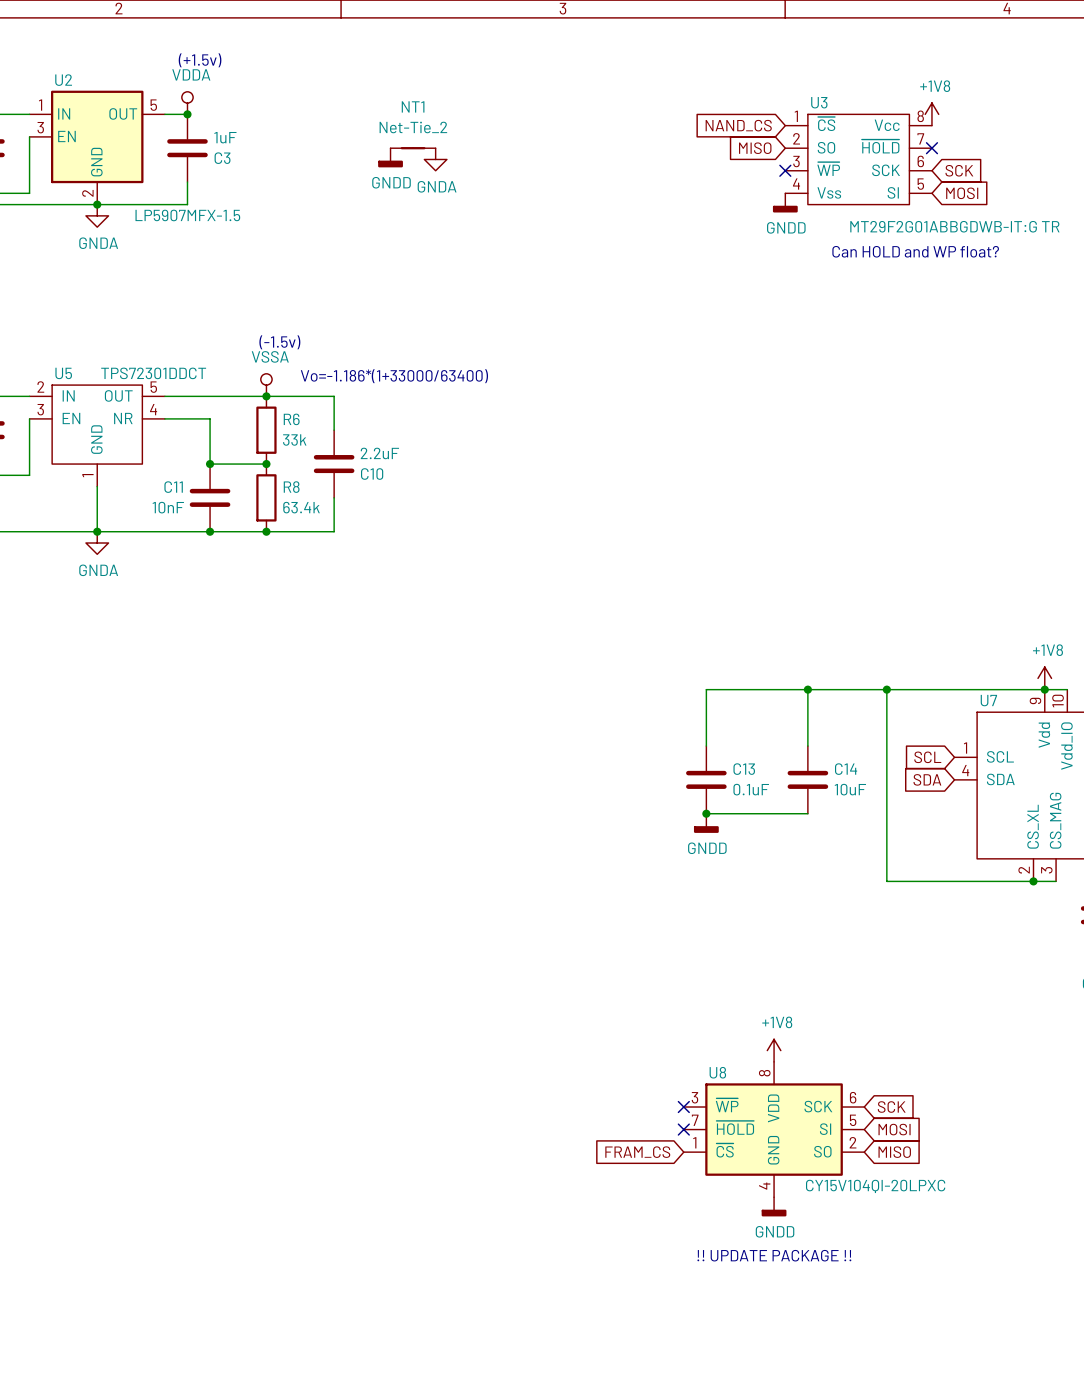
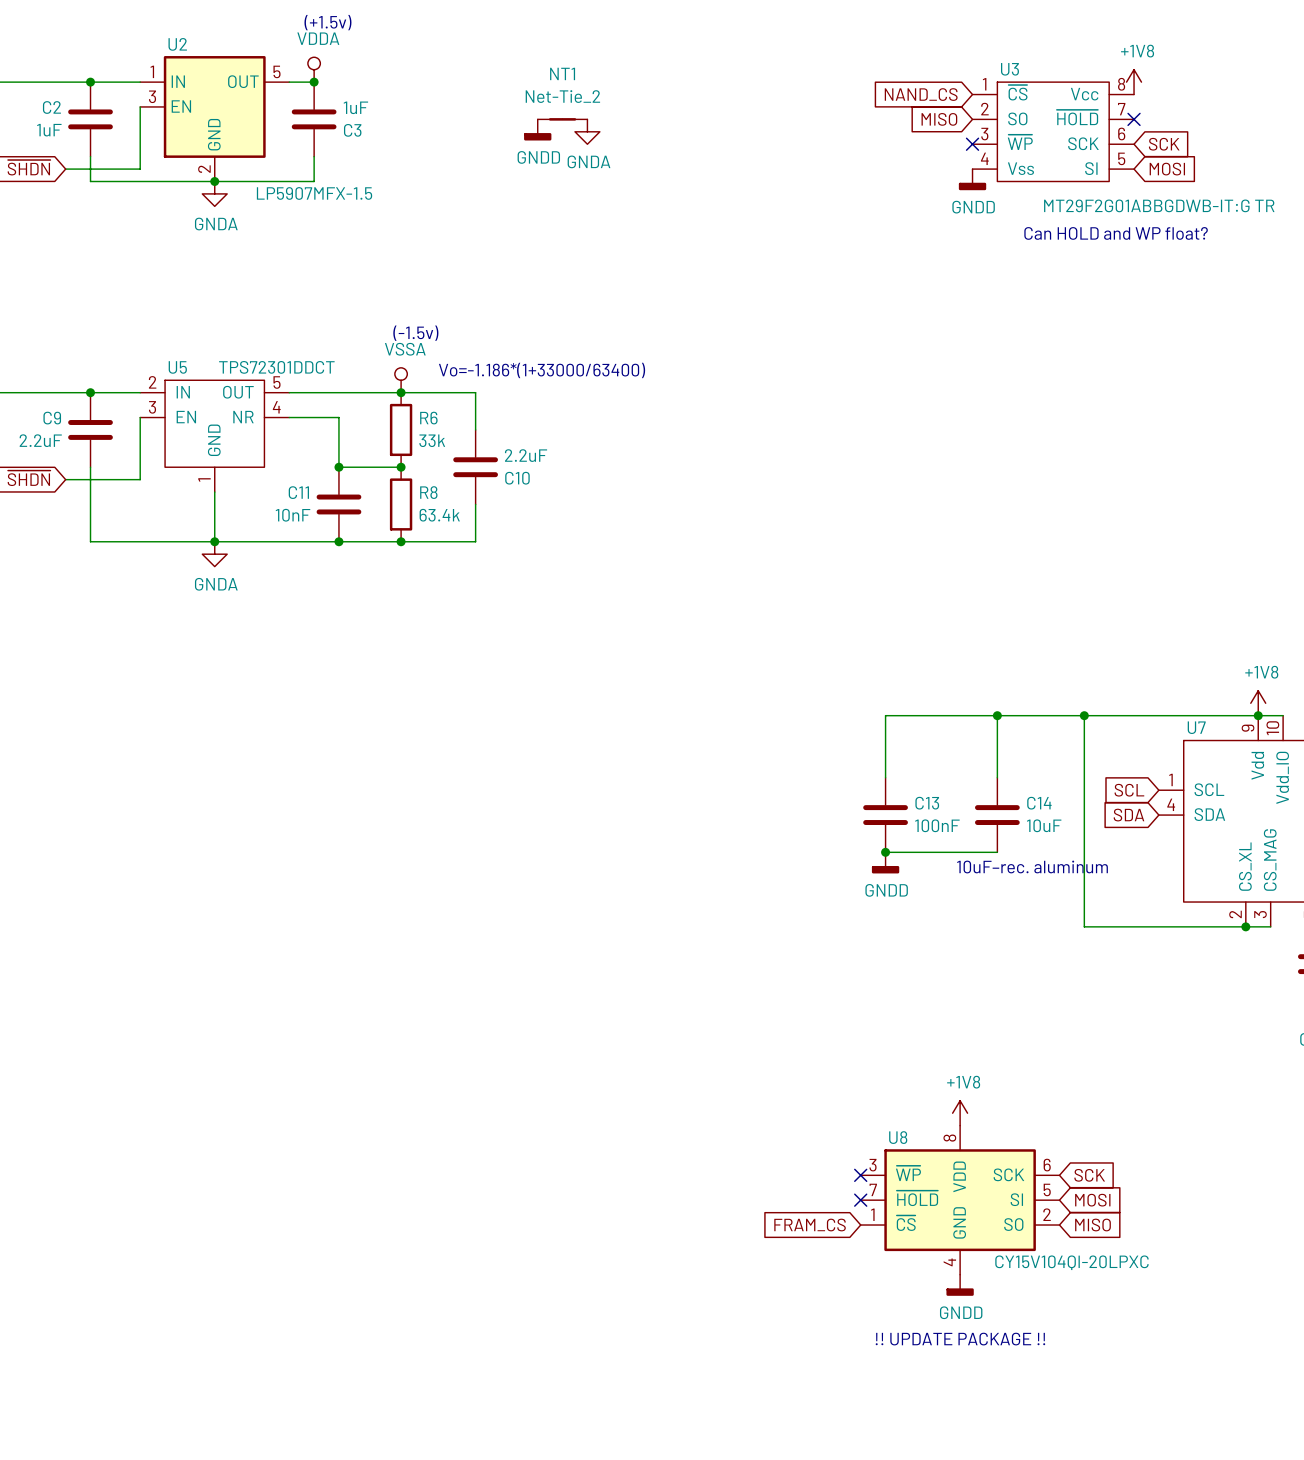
C13 value: 0.1uF (751, 789) -> 100nF (937, 825)
text: none -> 10uF–rec. aluminum (1032, 866)

